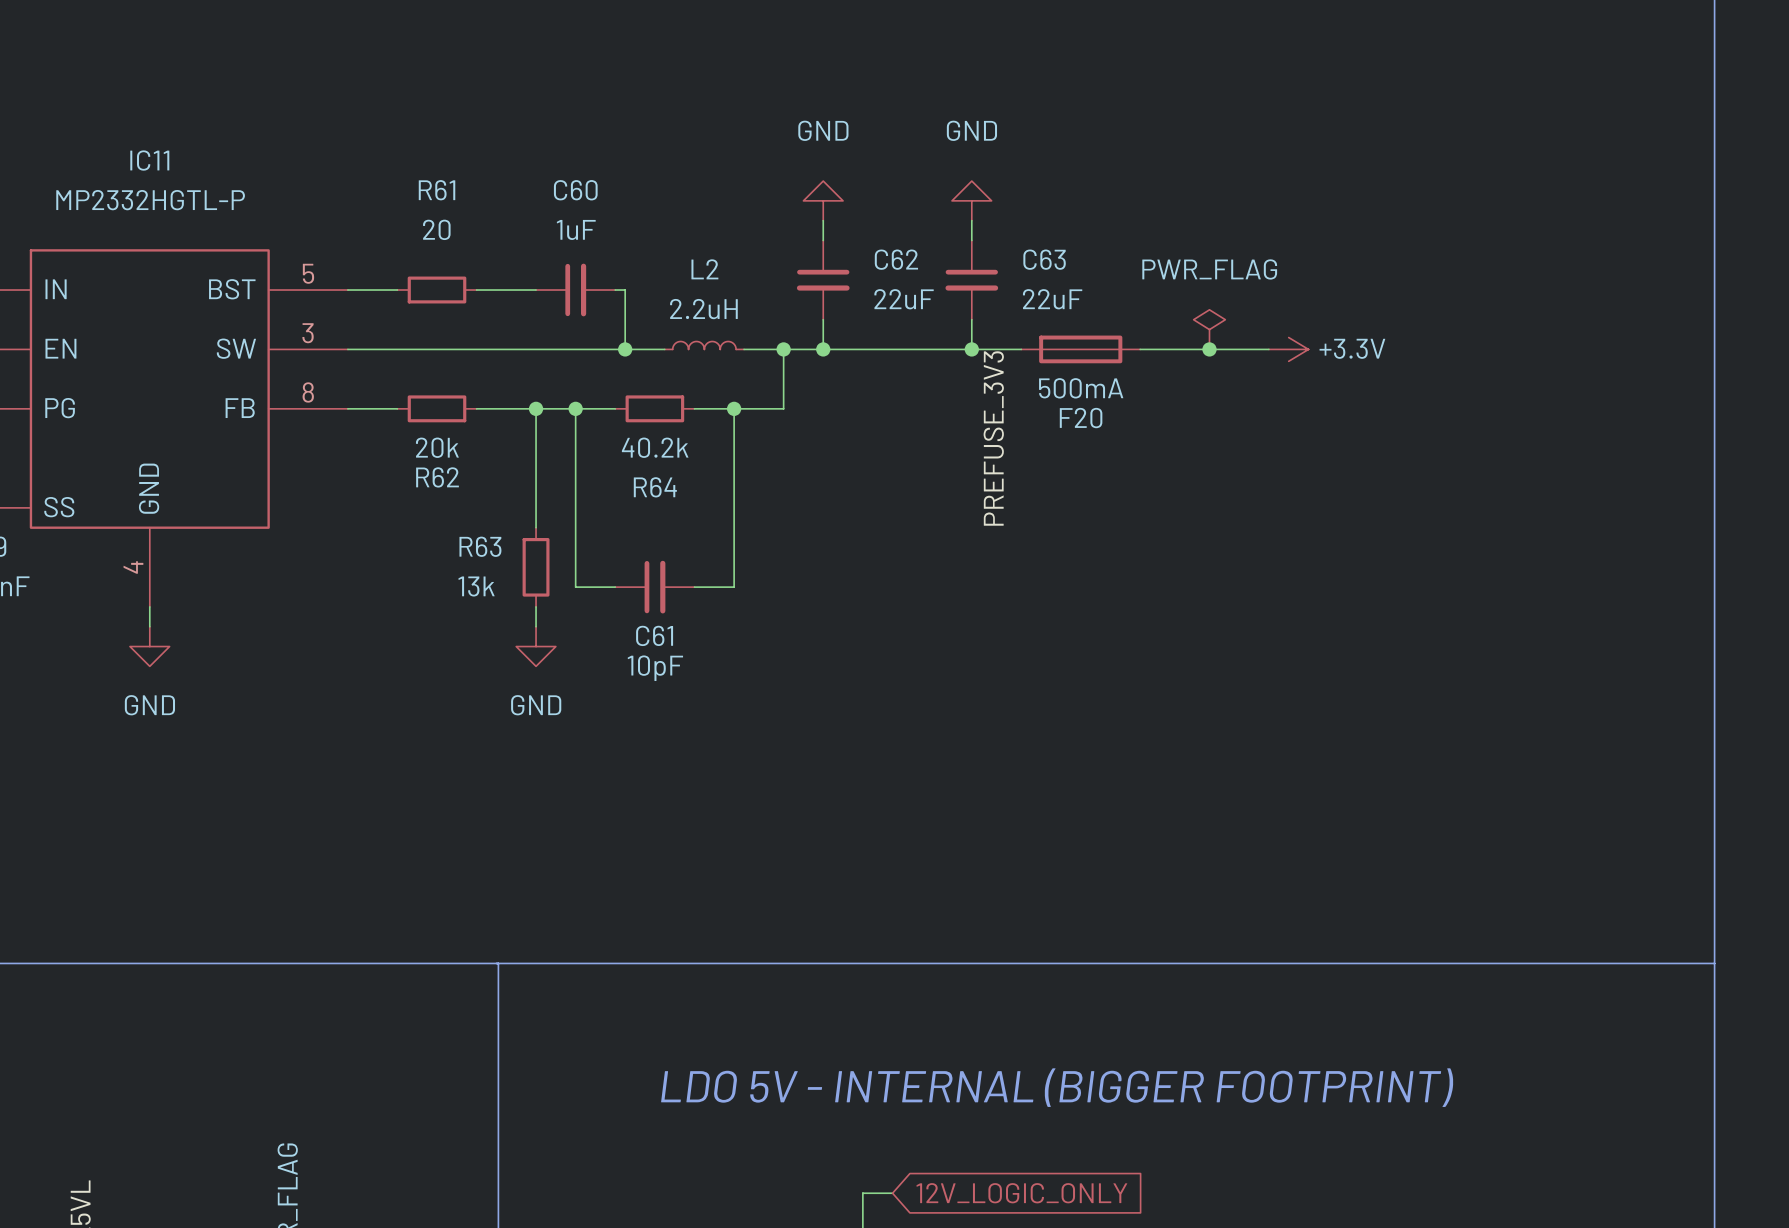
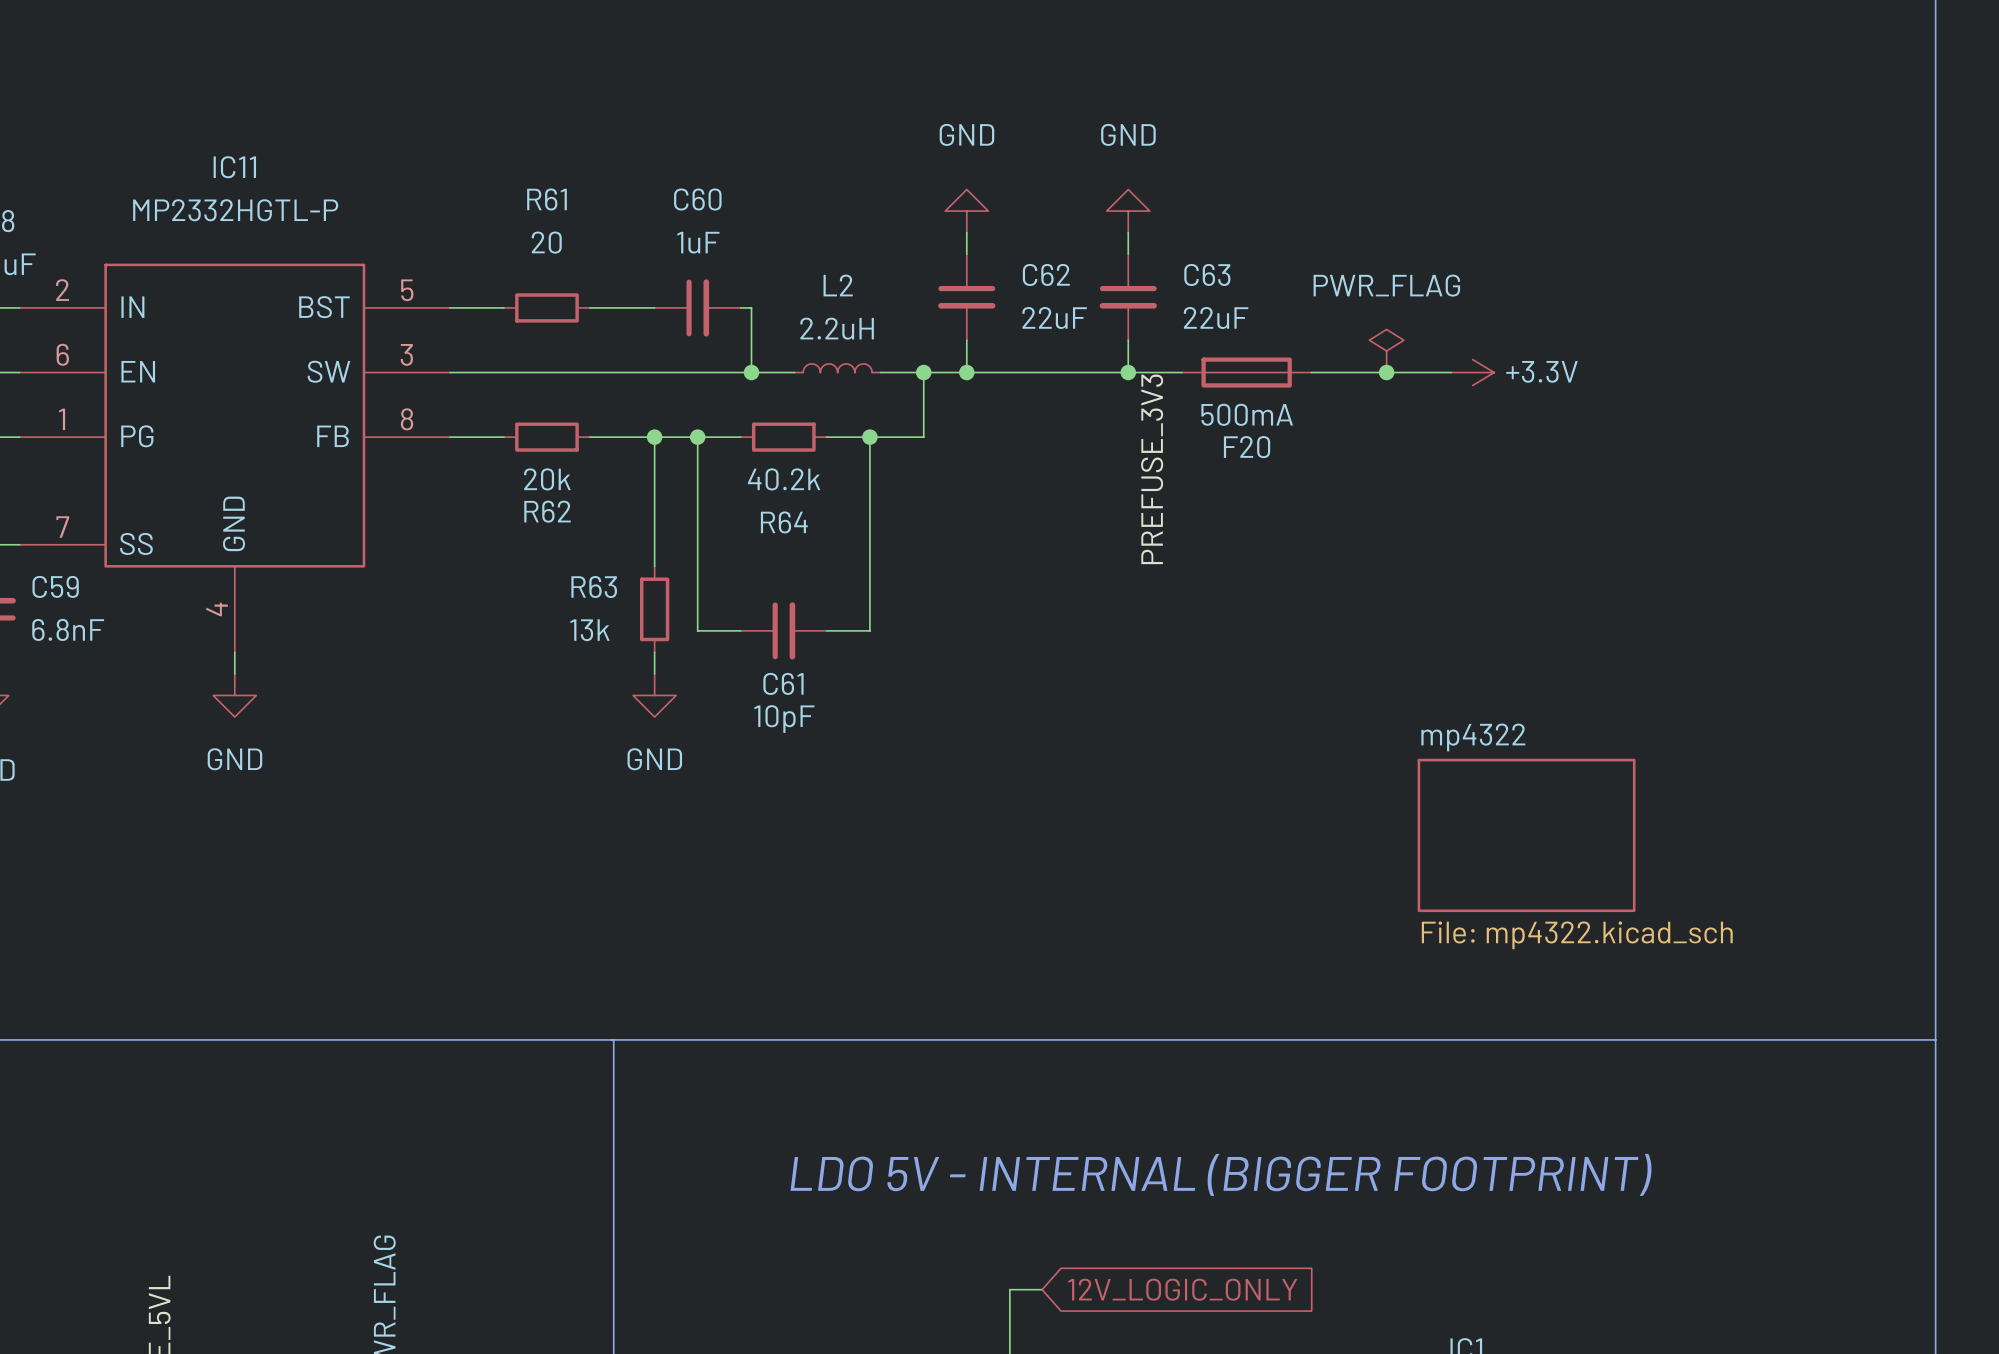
sheet mp4322: none -> File: mp4322.kicad_sch (1526, 835)

